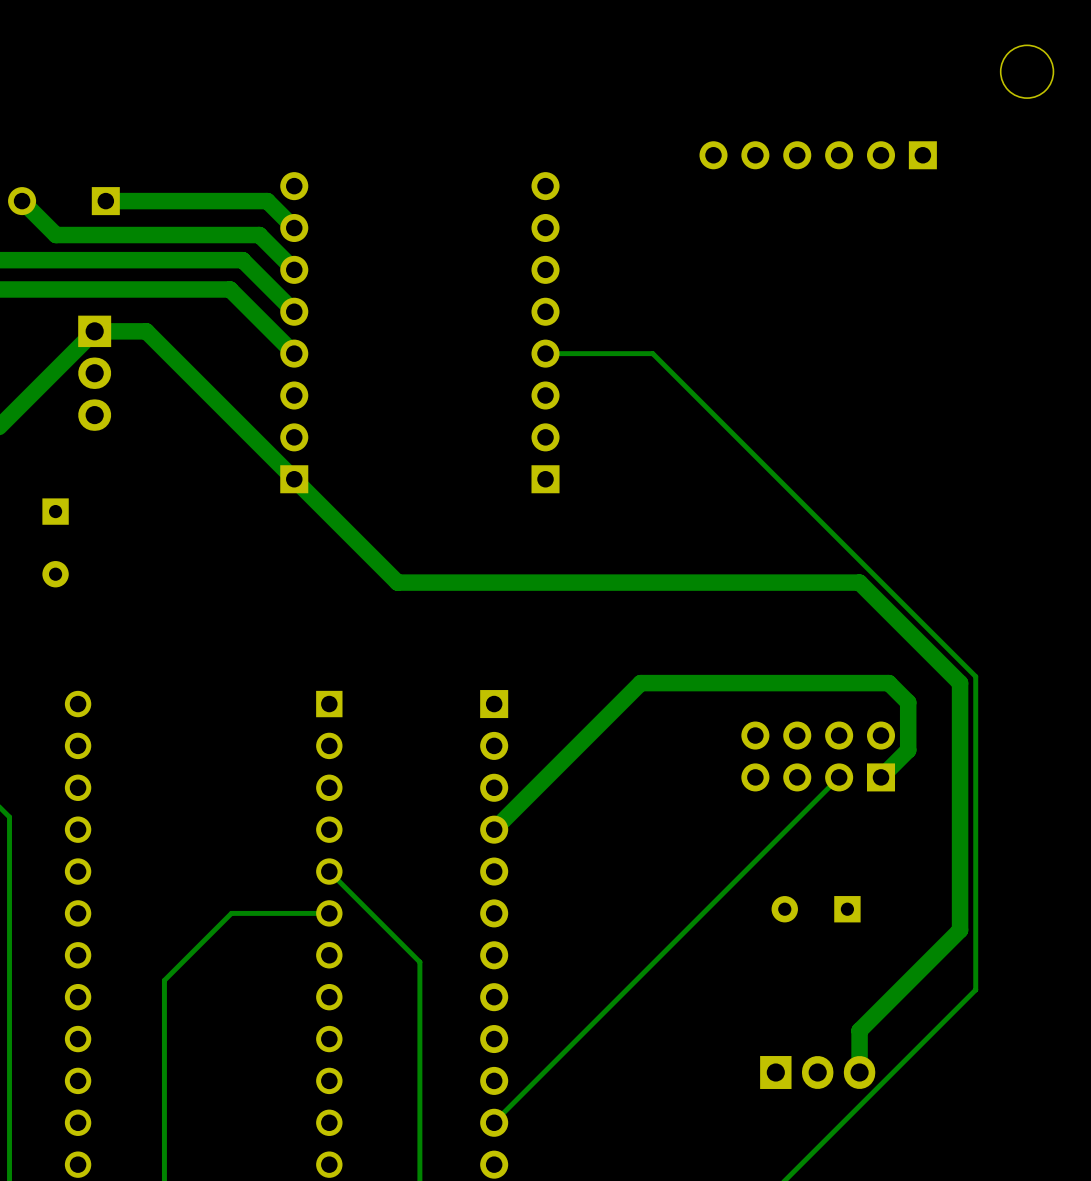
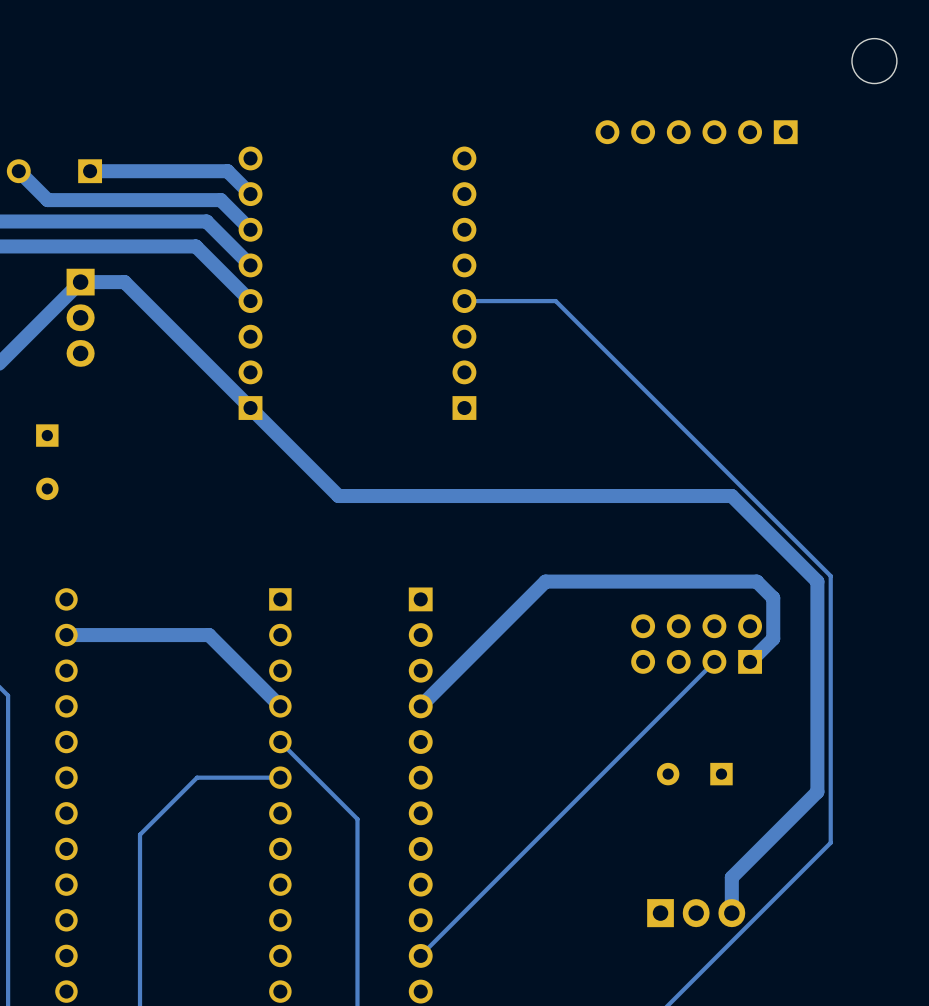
track: none -> (66, 635) (209, 635) (280, 706)

